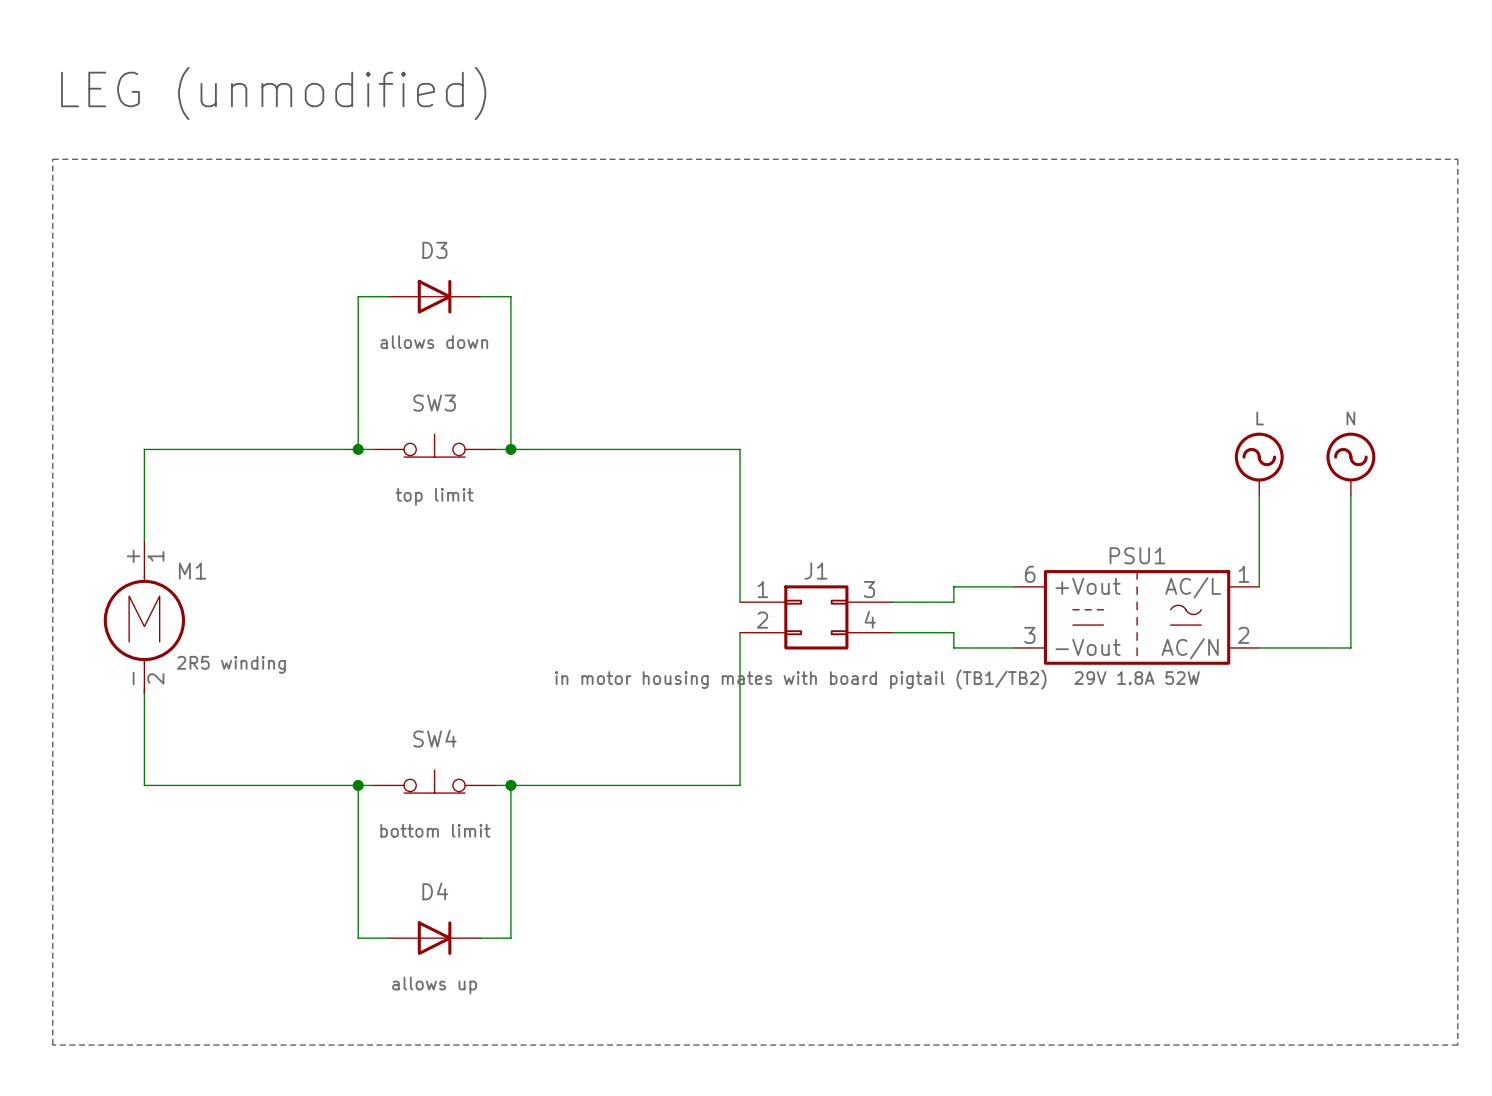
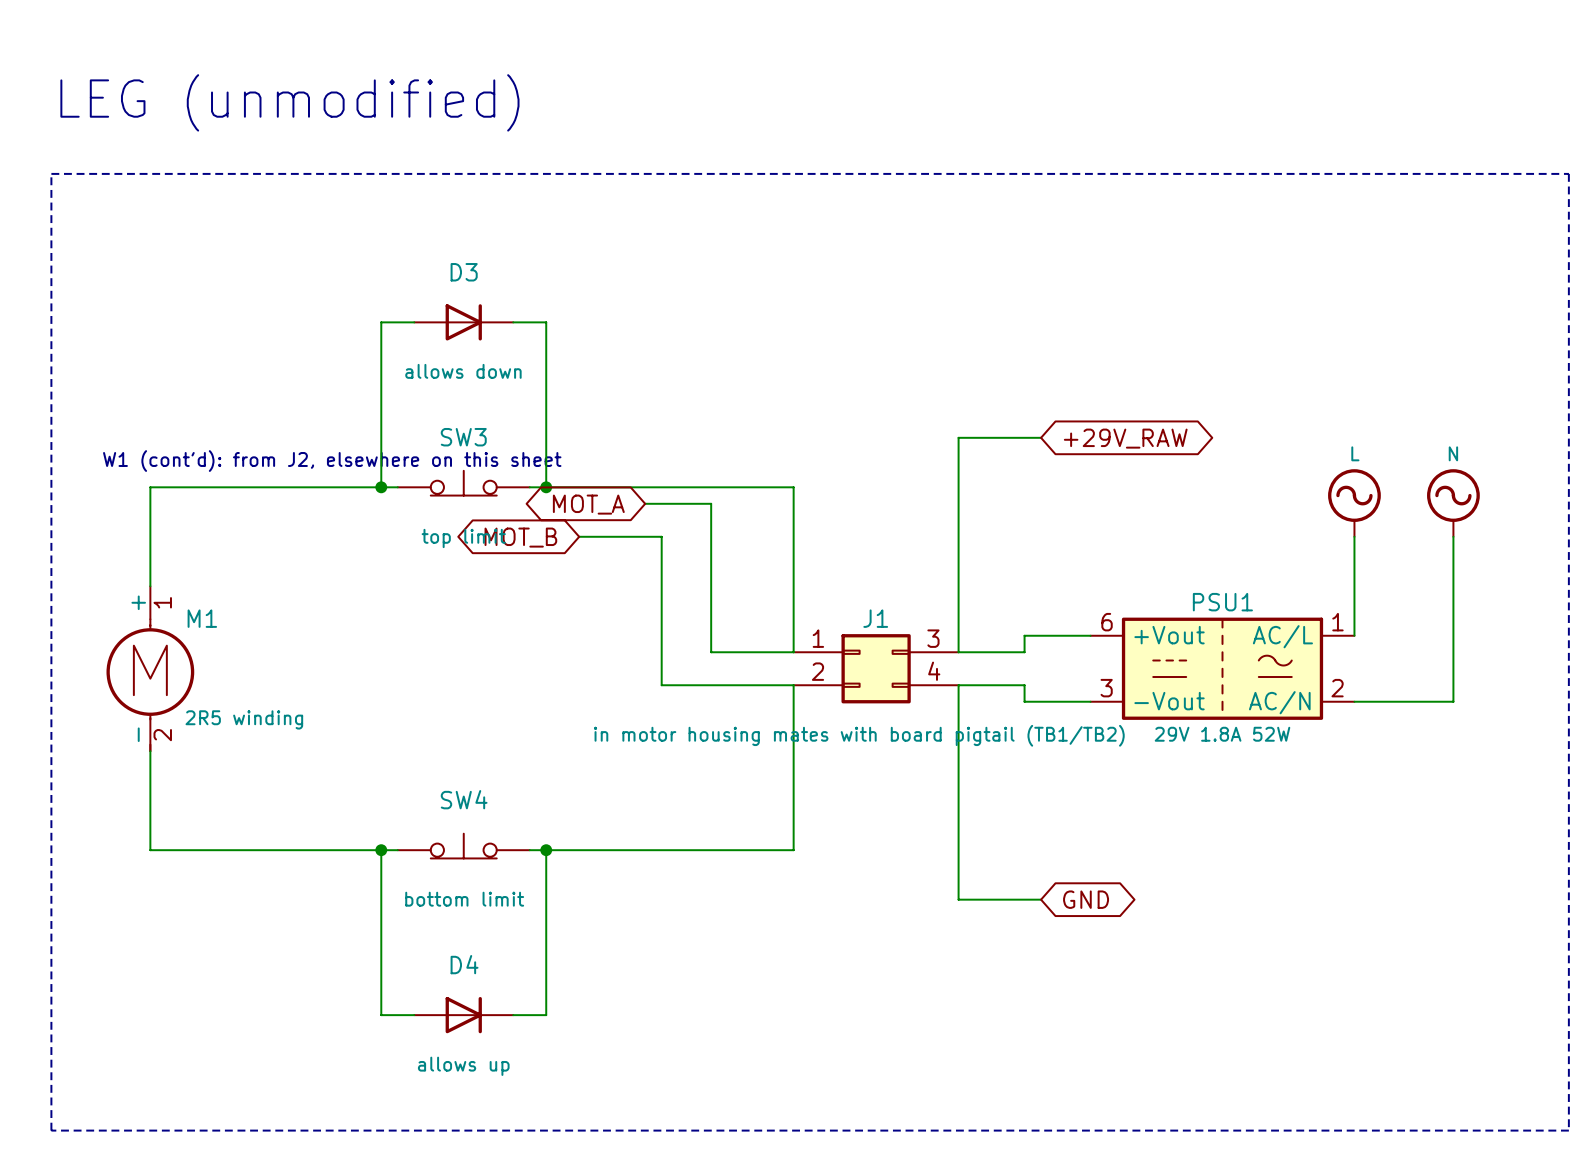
wire: none -> (1041, 437) (958, 437) (958, 652)
global label: none -> +29V_RAW (1125, 438)
text: none -> W1 (cont'd): from J2, elsewhere on this sheet (332, 461)
wire: none -> (645, 503) (711, 503) (711, 652) (793, 652)
global label: none -> MOT_A (588, 504)
global label: none -> MOT_B (520, 537)
wire: none -> (579, 536) (661, 536) (661, 685) (793, 685)
wire: none -> (958, 685) (958, 899) (1041, 899)
global label: none -> GND (1086, 899)

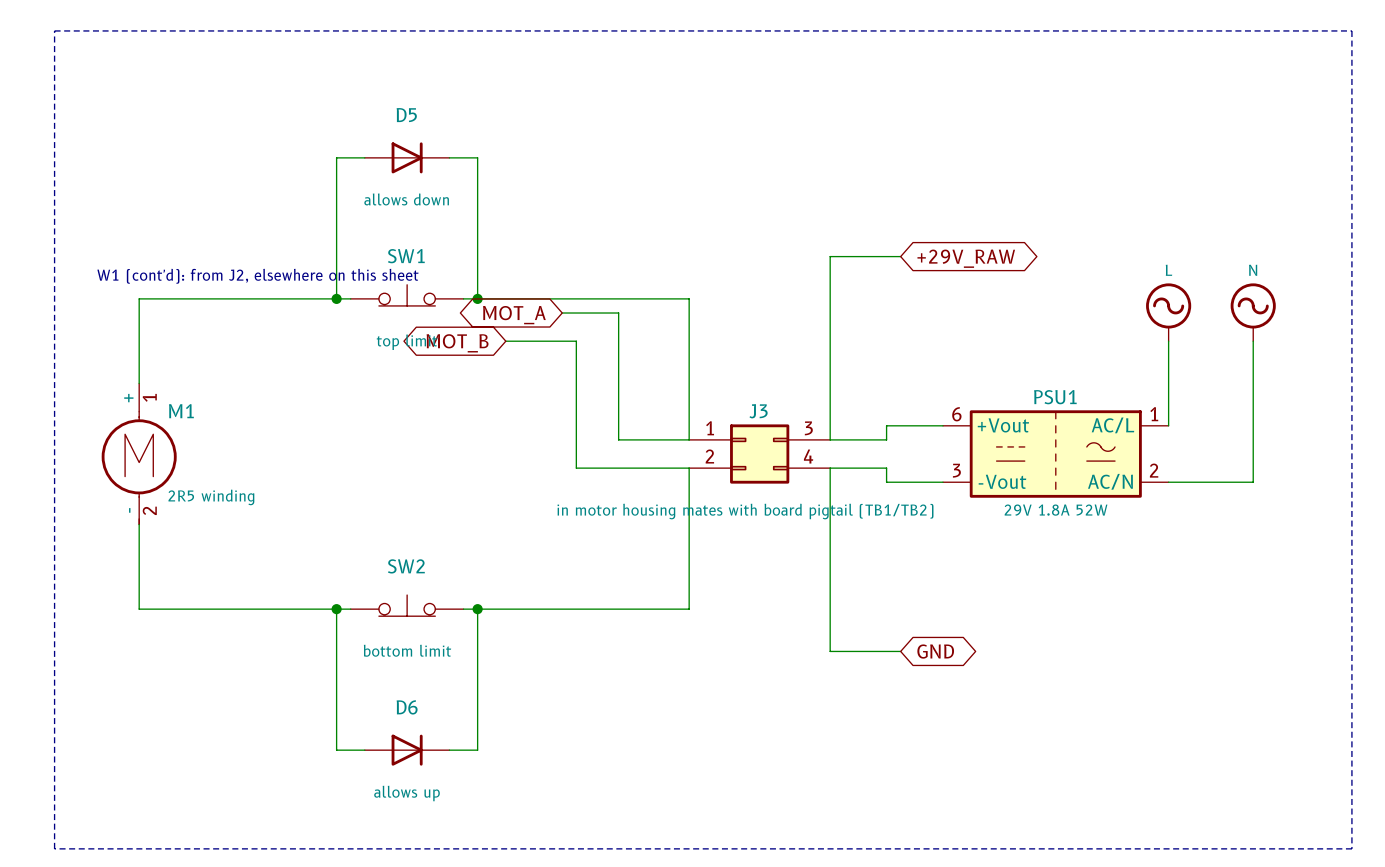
D3 name: D3 (464, 272) -> D5 (406, 115)
SW3 name: SW3 (463, 437) -> SW1 (406, 256)
J1 name: J1 (875, 618) -> J3 (758, 411)
SW4 name: SW4 (464, 799) -> SW2 (406, 566)
D4 name: D4 (464, 964) -> D6 (407, 707)

